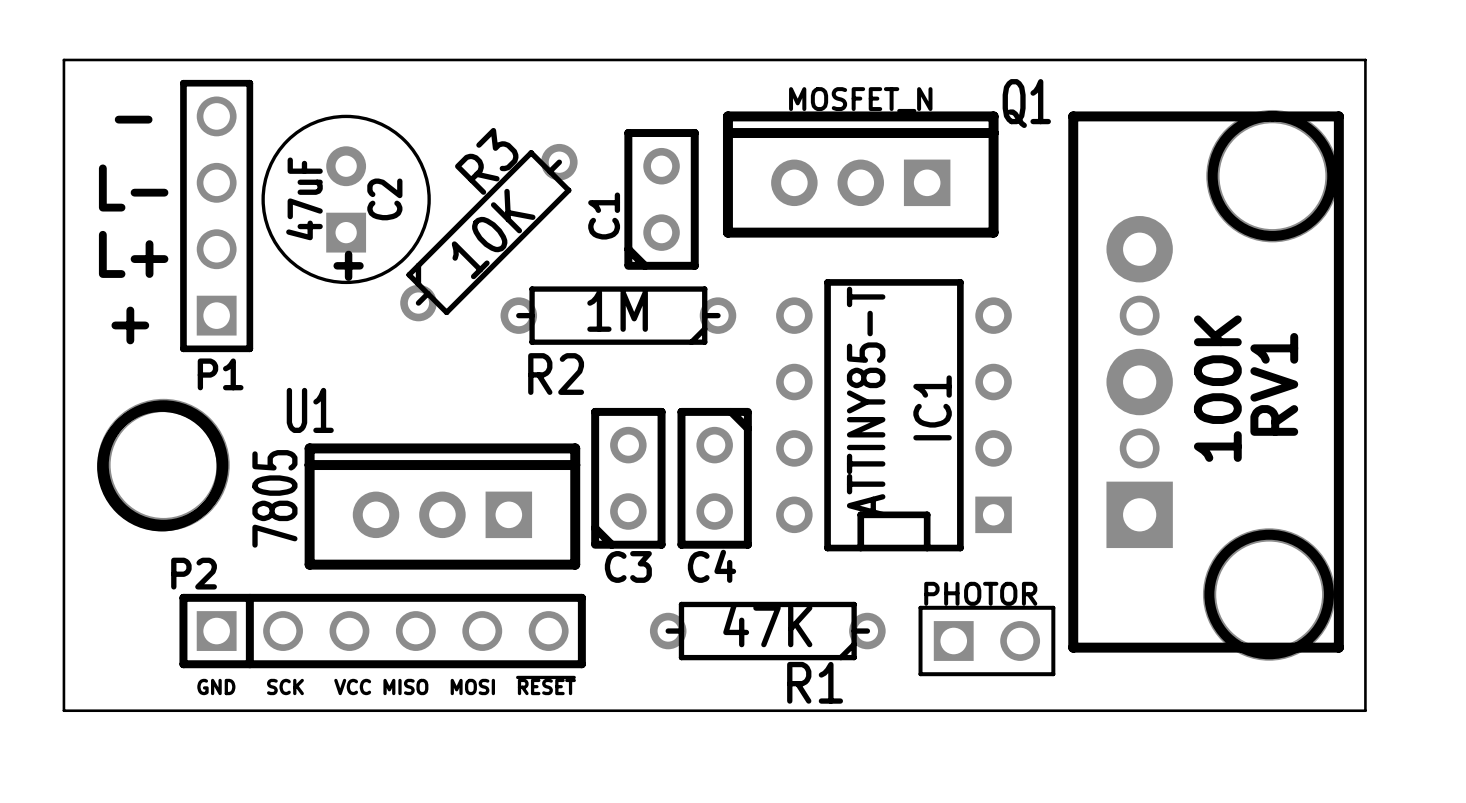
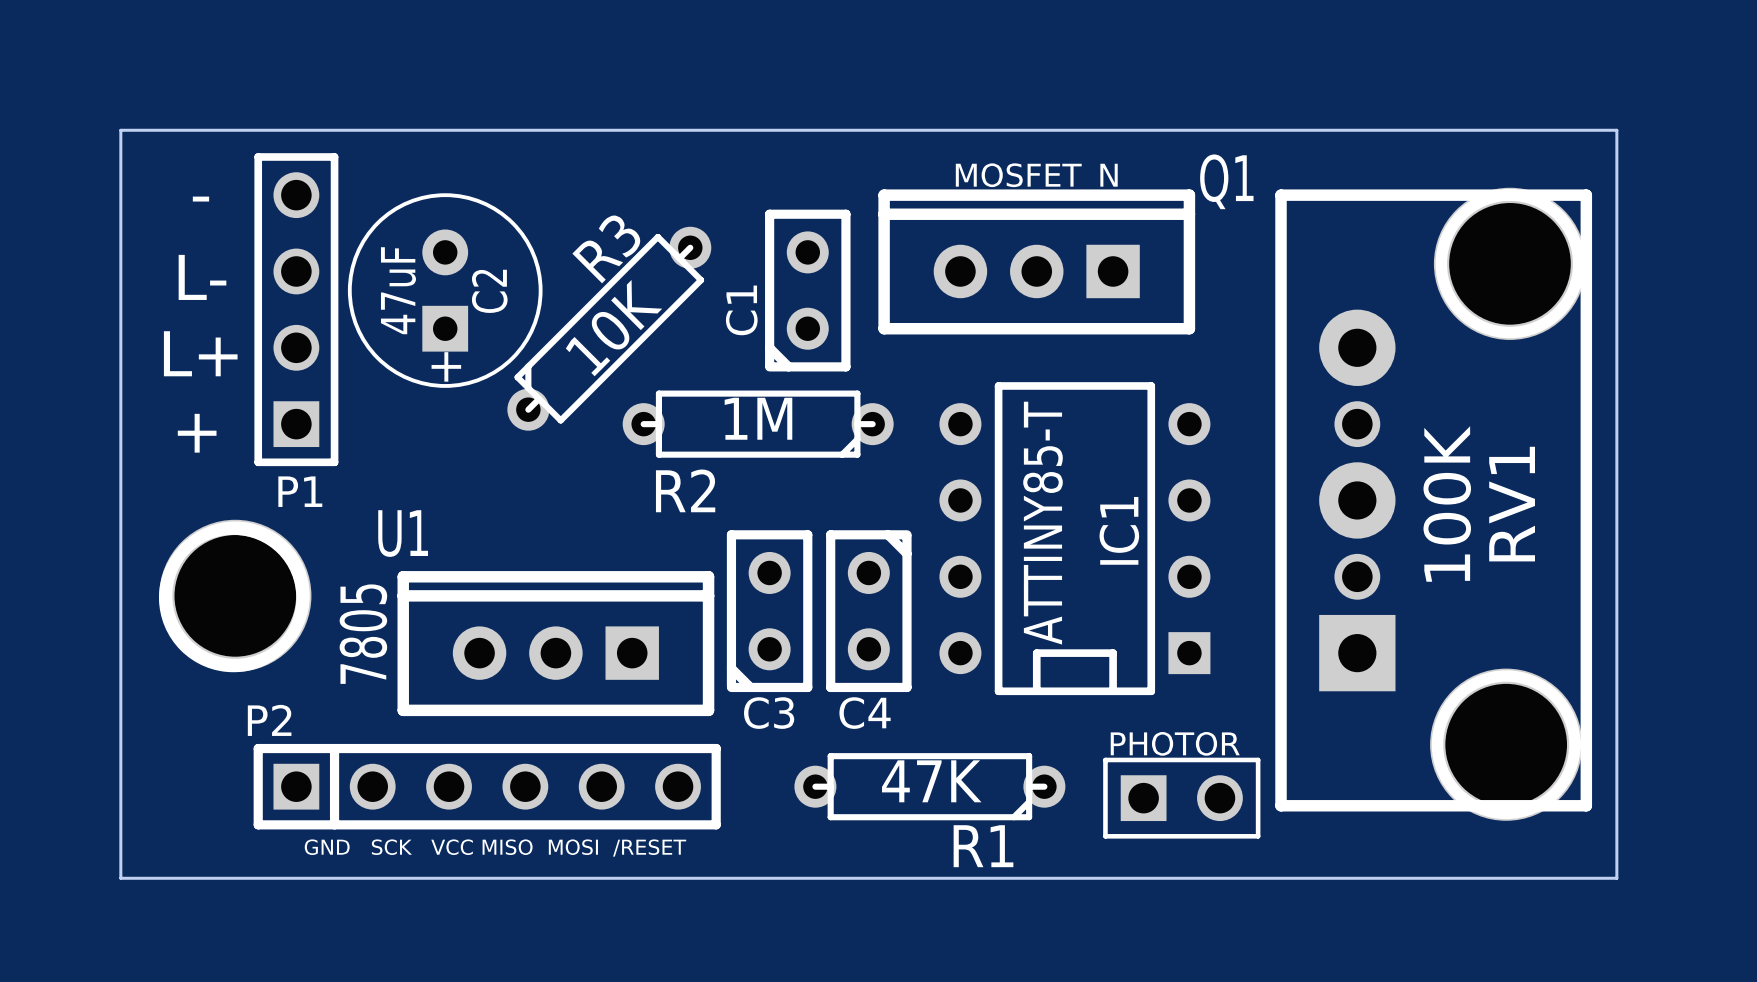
text: GND SCK VCC MISO MOSI ~{RESET} (386, 685) -> GND SCK VCC MISO MOSI /RESET (495, 848)

